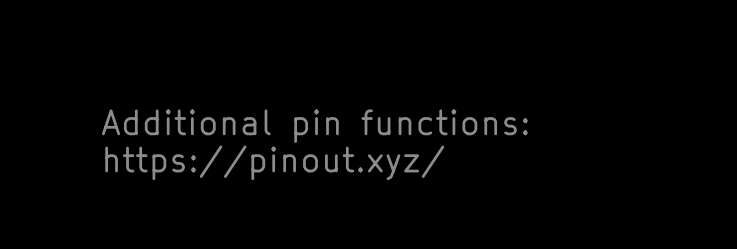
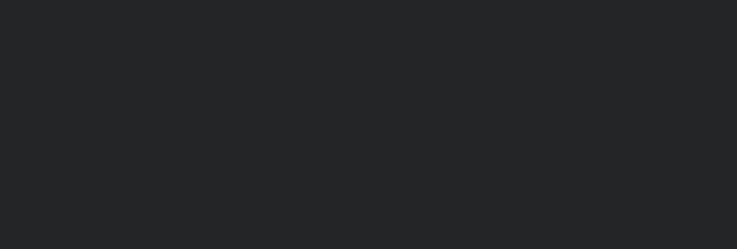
text: Additional pin functions: (314, 126) -> none
text: https://pinout.xyz/ (274, 162) -> none

